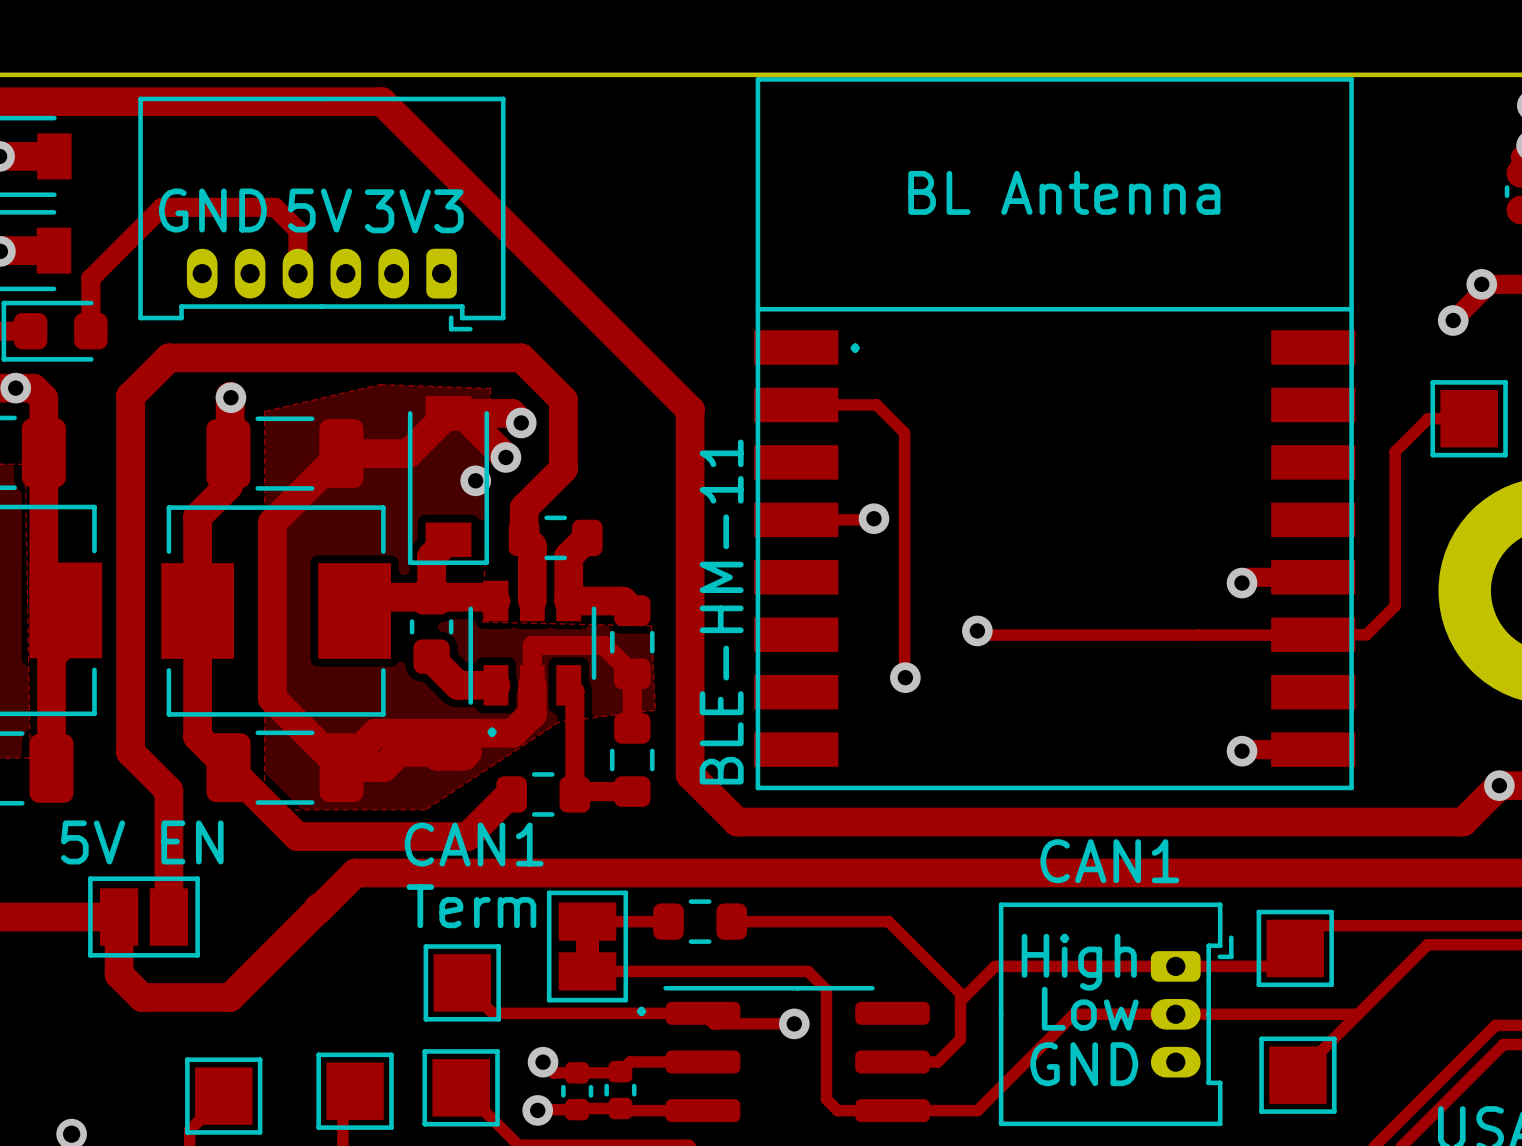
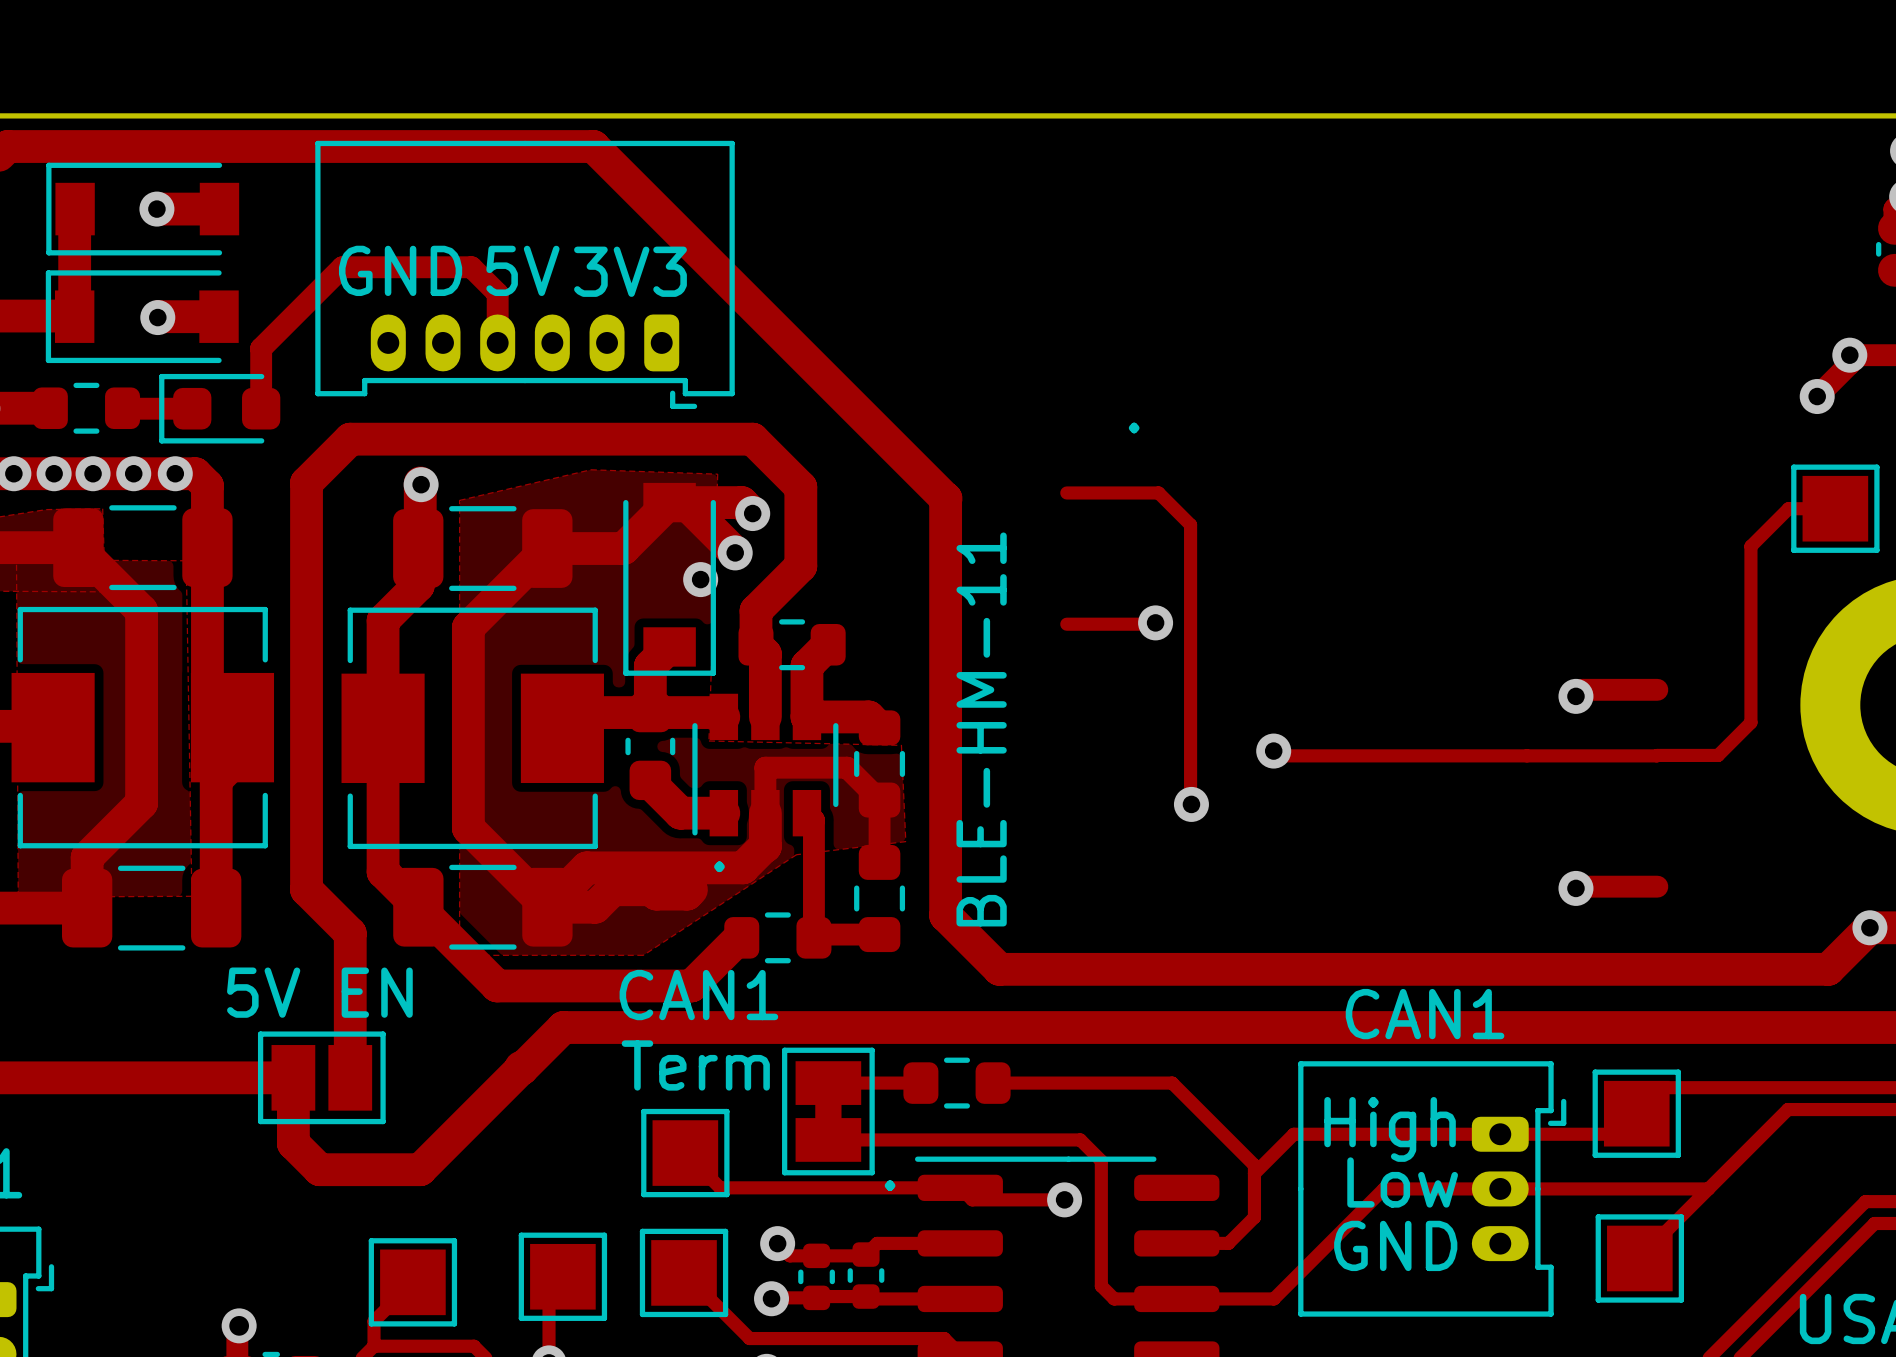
part: (1054, 433) -> none

